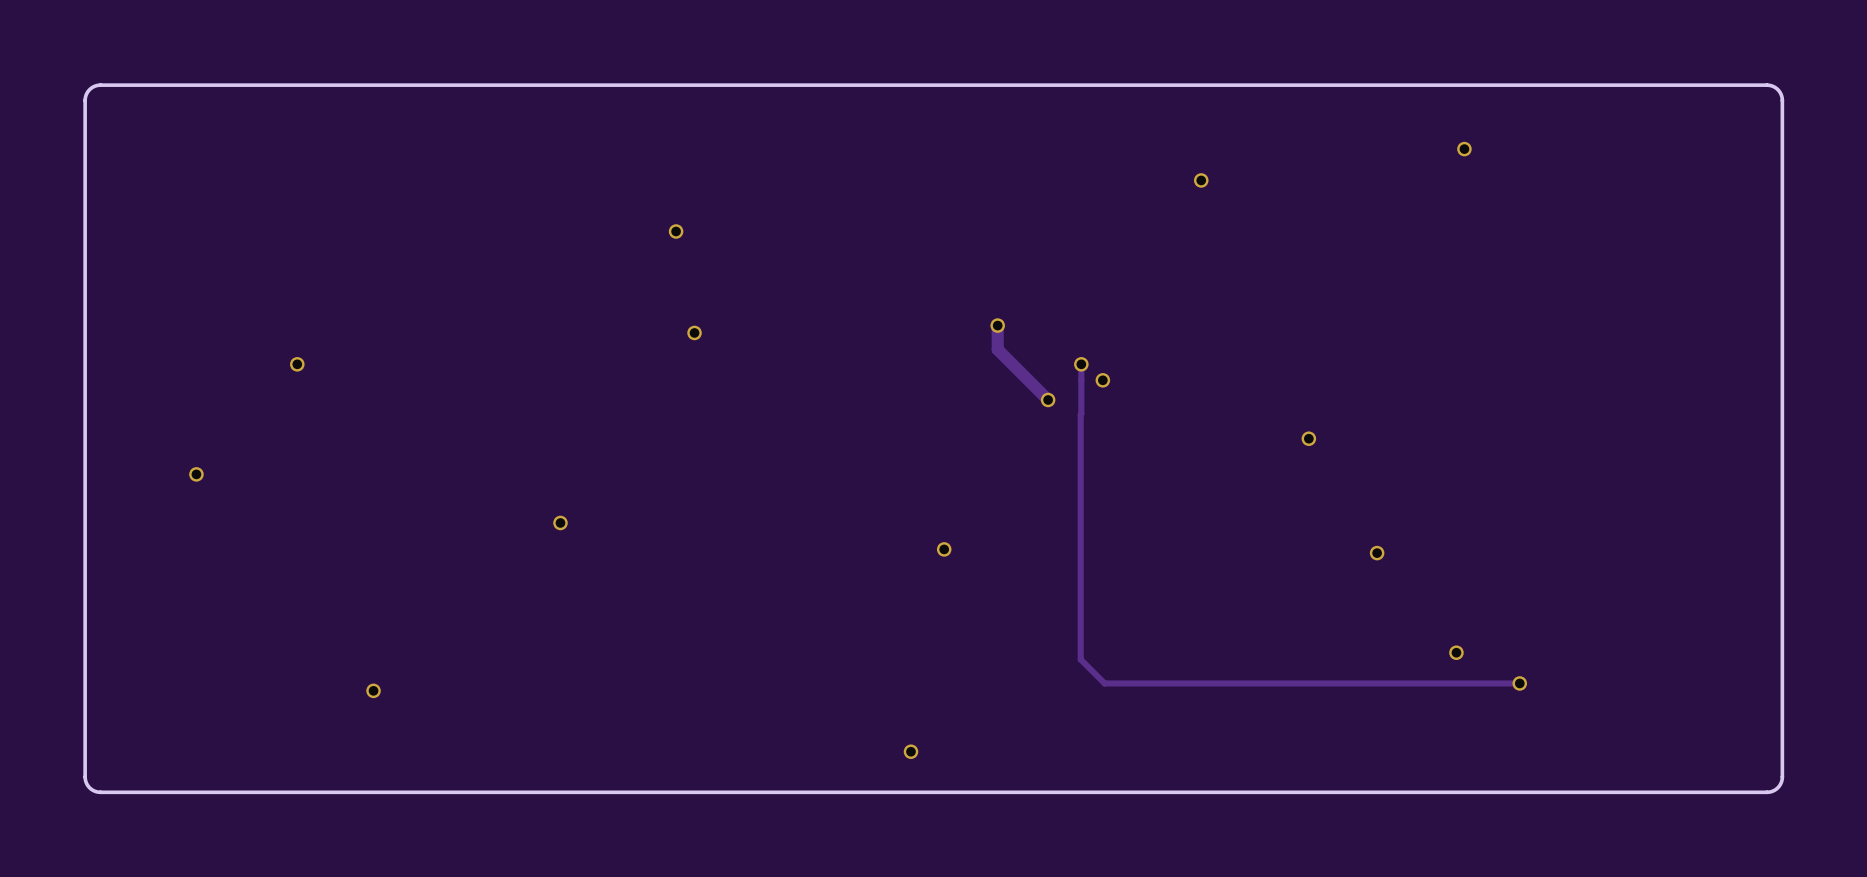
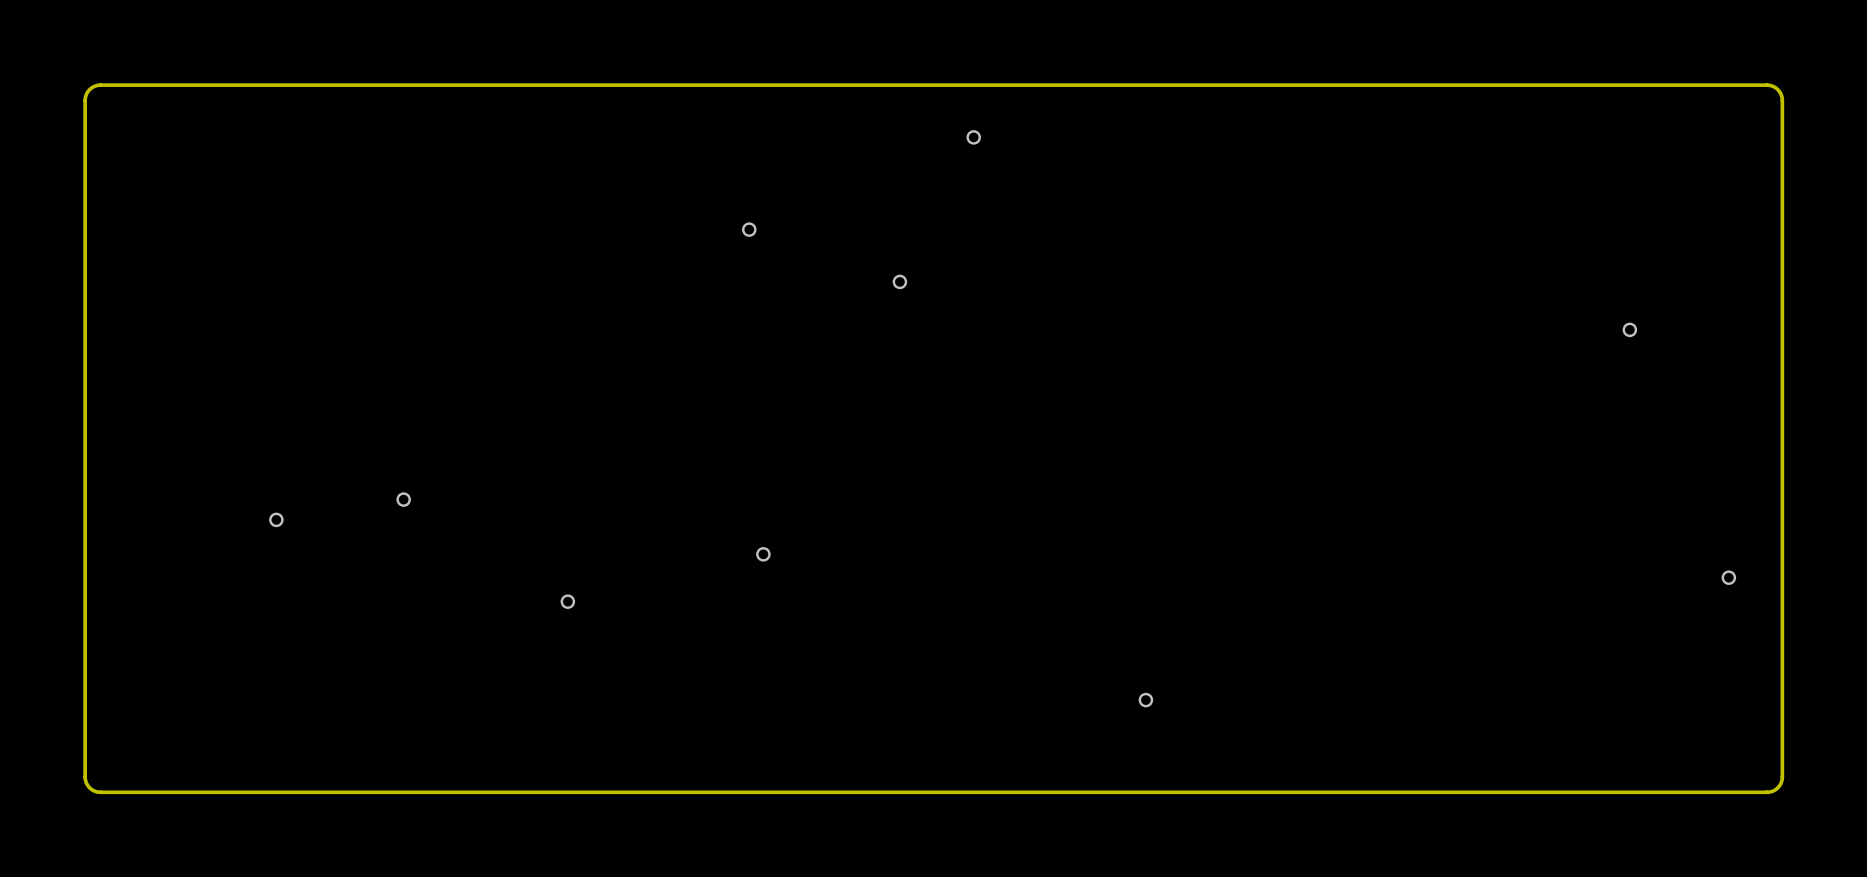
via: none -> (973, 137)
via: (1464, 149) -> none
via: (1201, 180) -> none
via: none -> (749, 229)
via: (676, 231) -> none
via: none -> (899, 281)
track: (997, 325) (997, 349) (1048, 399) -> none
via: (997, 325) -> none
via: none -> (1629, 329)
via: (694, 332) -> none
via: (297, 364) -> none
track: (1081, 364) (1080, 659) (1104, 683) (1519, 683) -> none
via: (1081, 364) -> none
via: (1102, 380) -> none
via: (1048, 399) -> none
via: (1308, 438) -> none
via: (196, 474) -> none
via: none -> (403, 499)
via: none -> (276, 519)
via: (560, 522) -> none
via: (944, 549) -> none
via: (1377, 553) -> none
via: none -> (763, 554)
via: none -> (1728, 577)
via: none -> (567, 601)
via: (1456, 652) -> none
via: (1519, 683) -> none
via: (373, 690) -> none
via: none -> (1145, 700)
via: (910, 751) -> none

